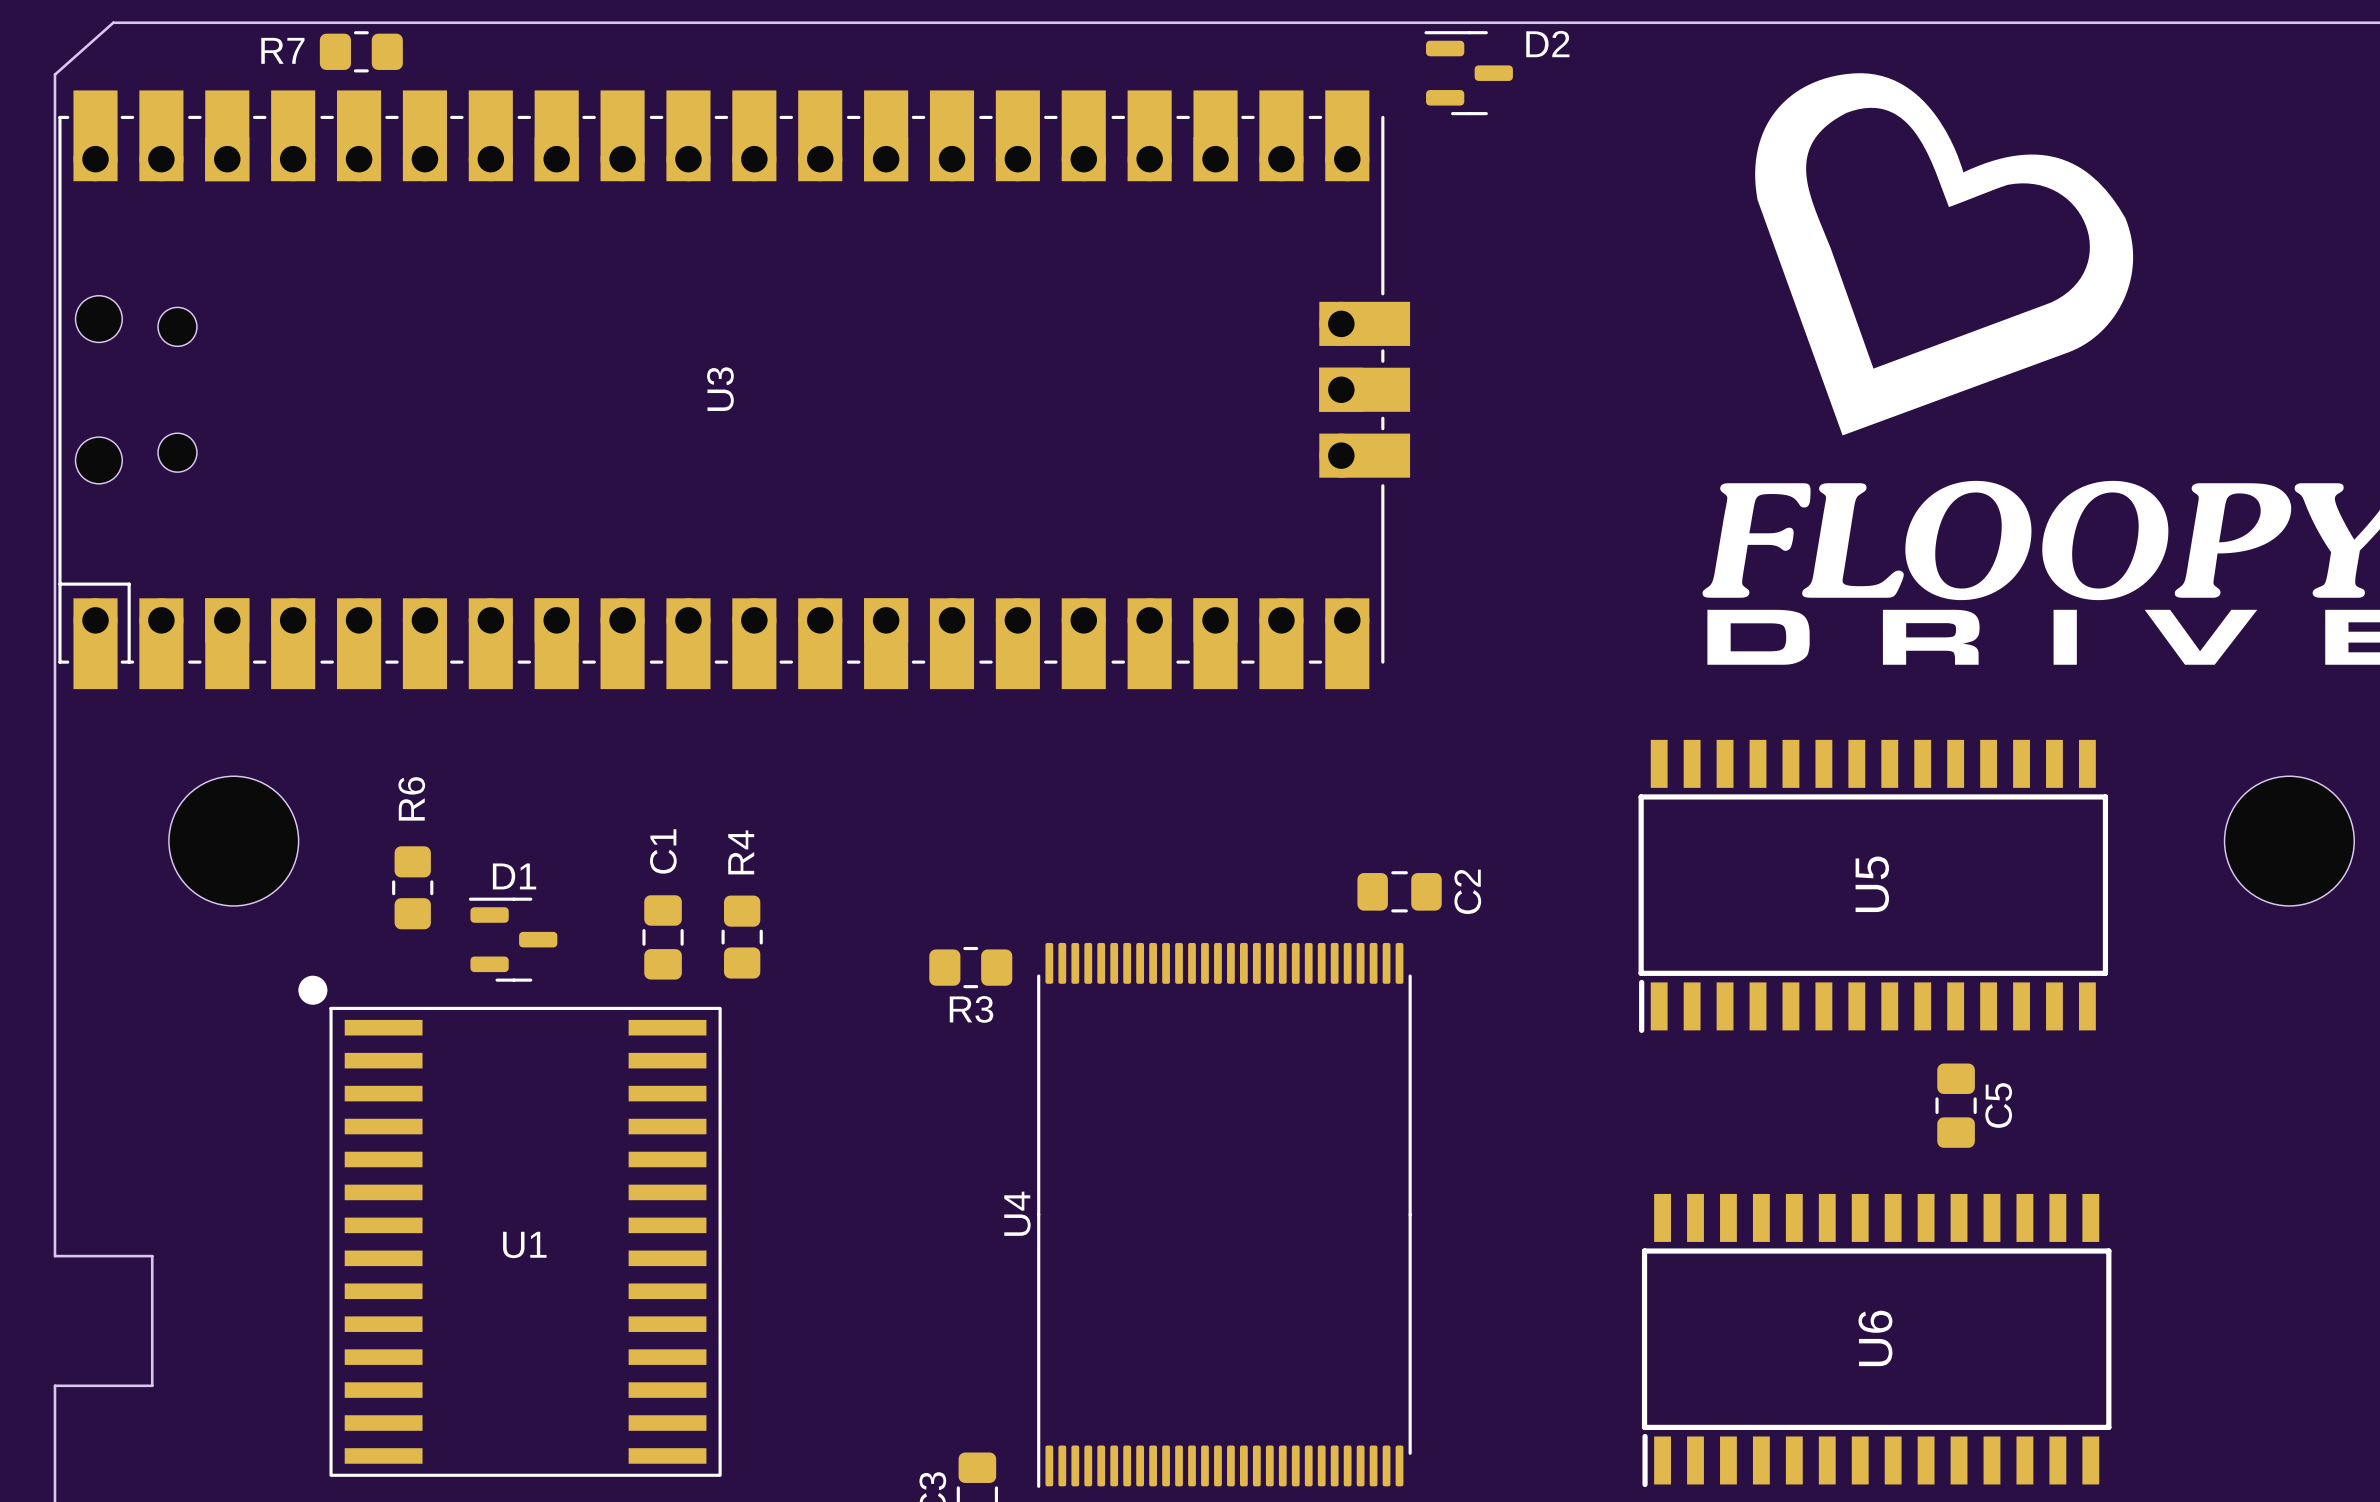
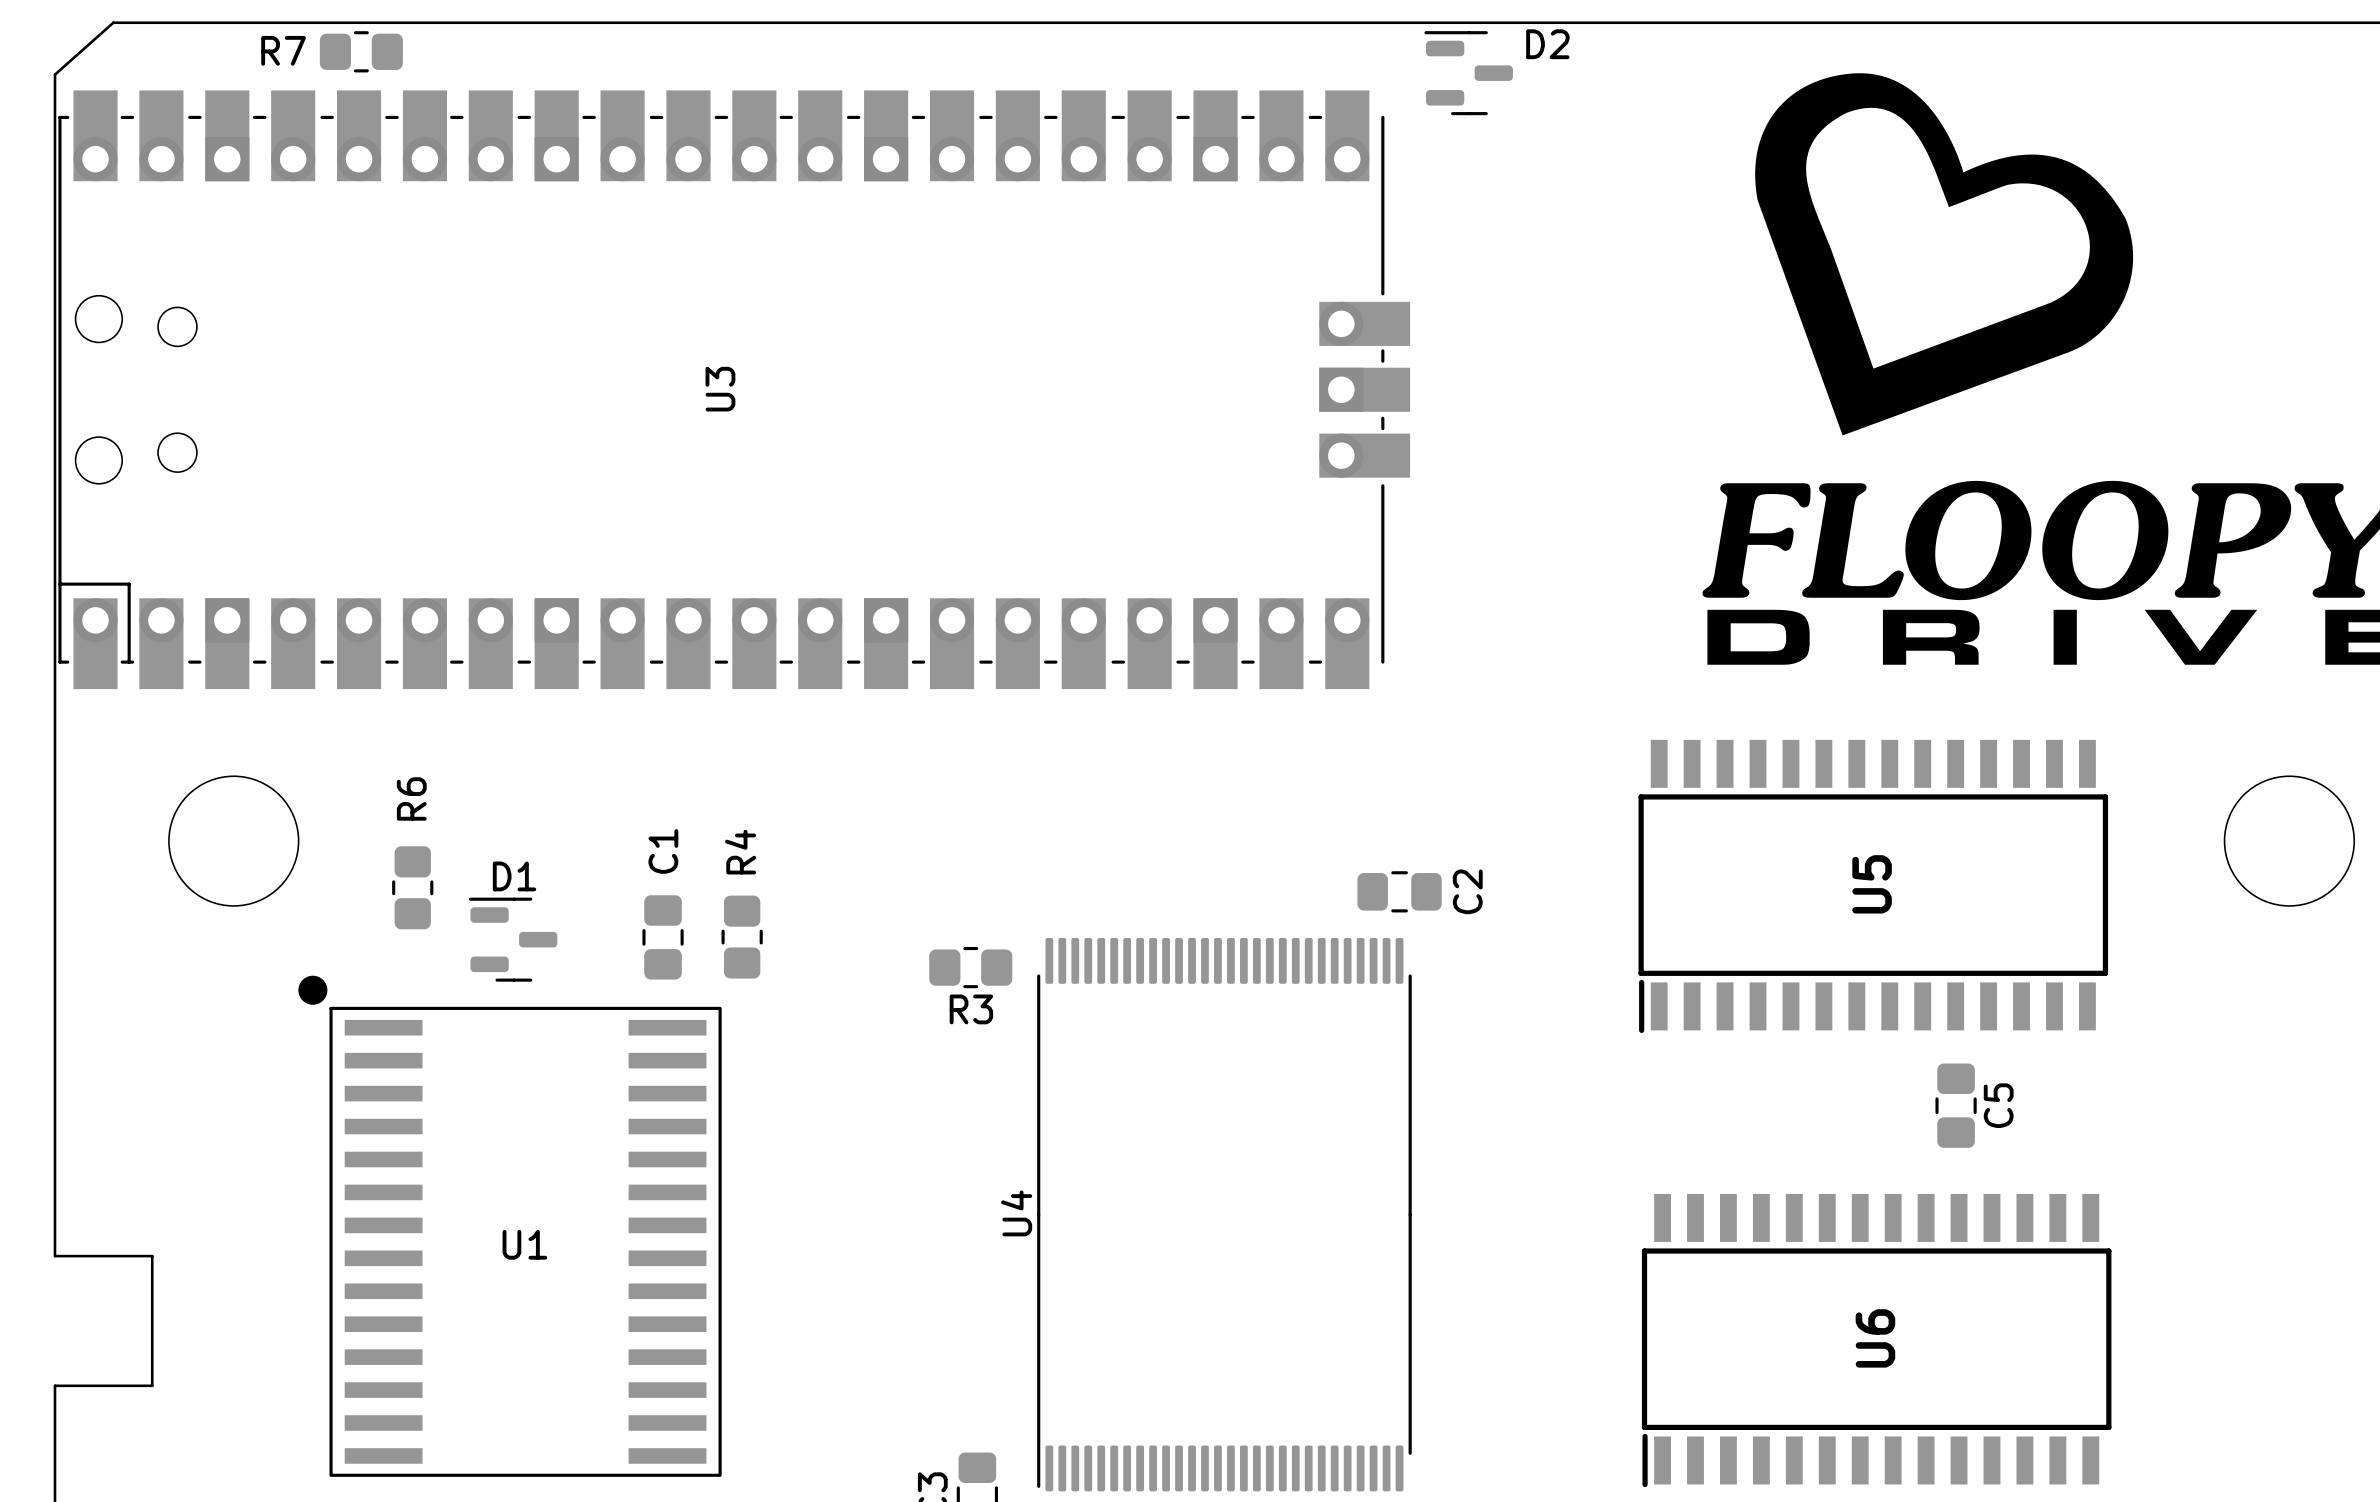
U4 footprint: [1037, 942, 1412, 1488] -> [1037, 937, 1412, 1492]

